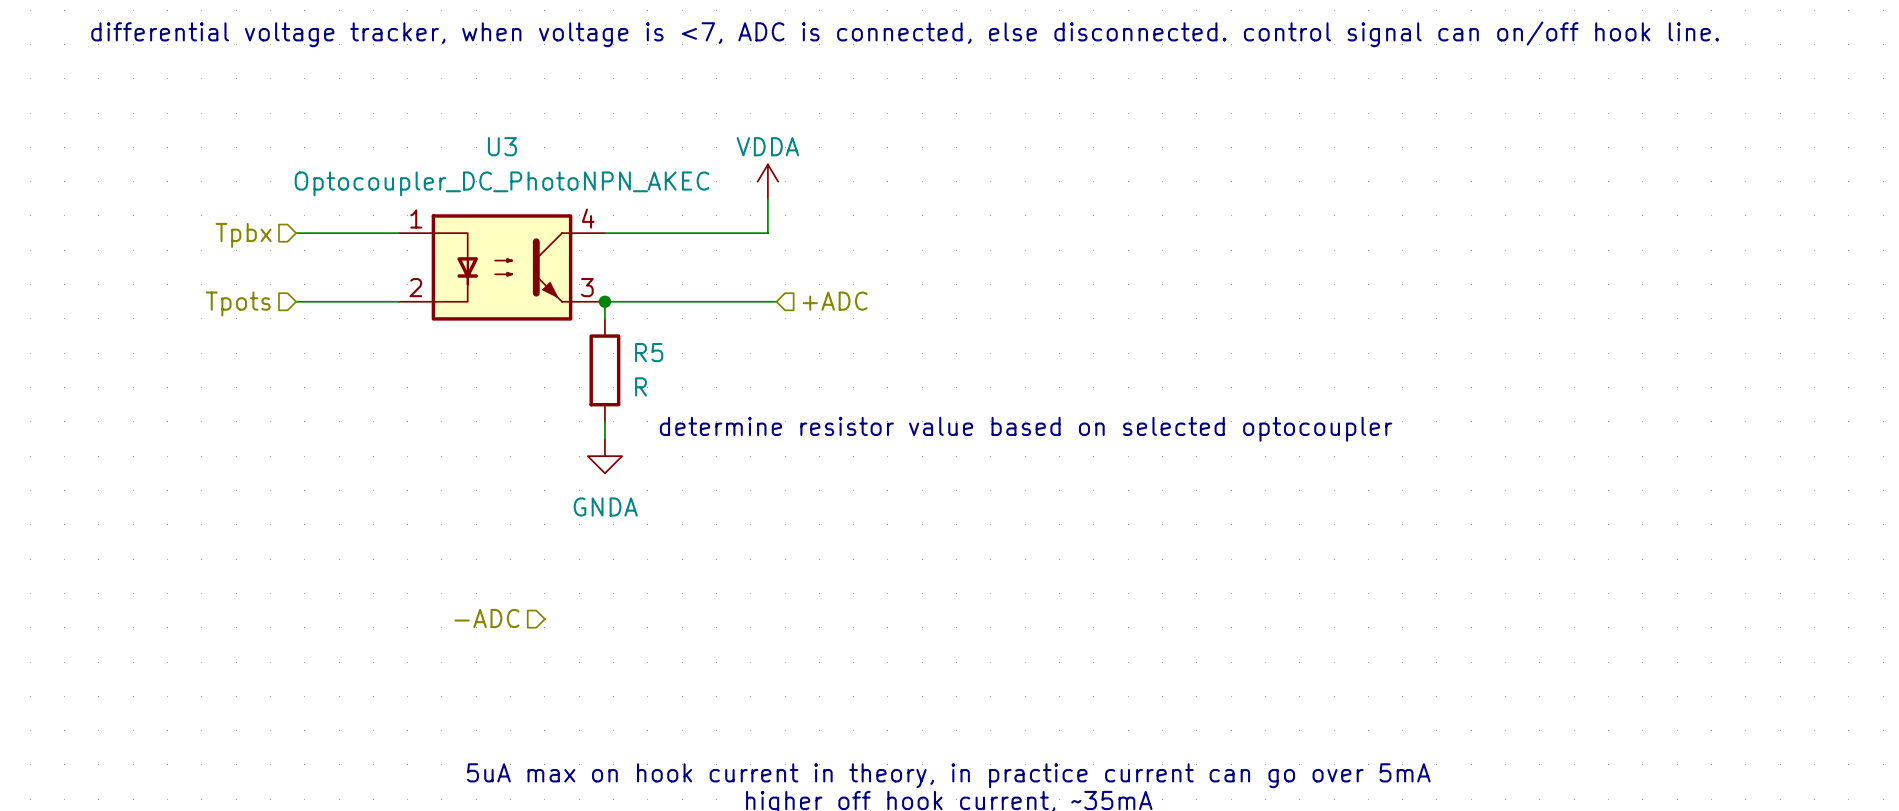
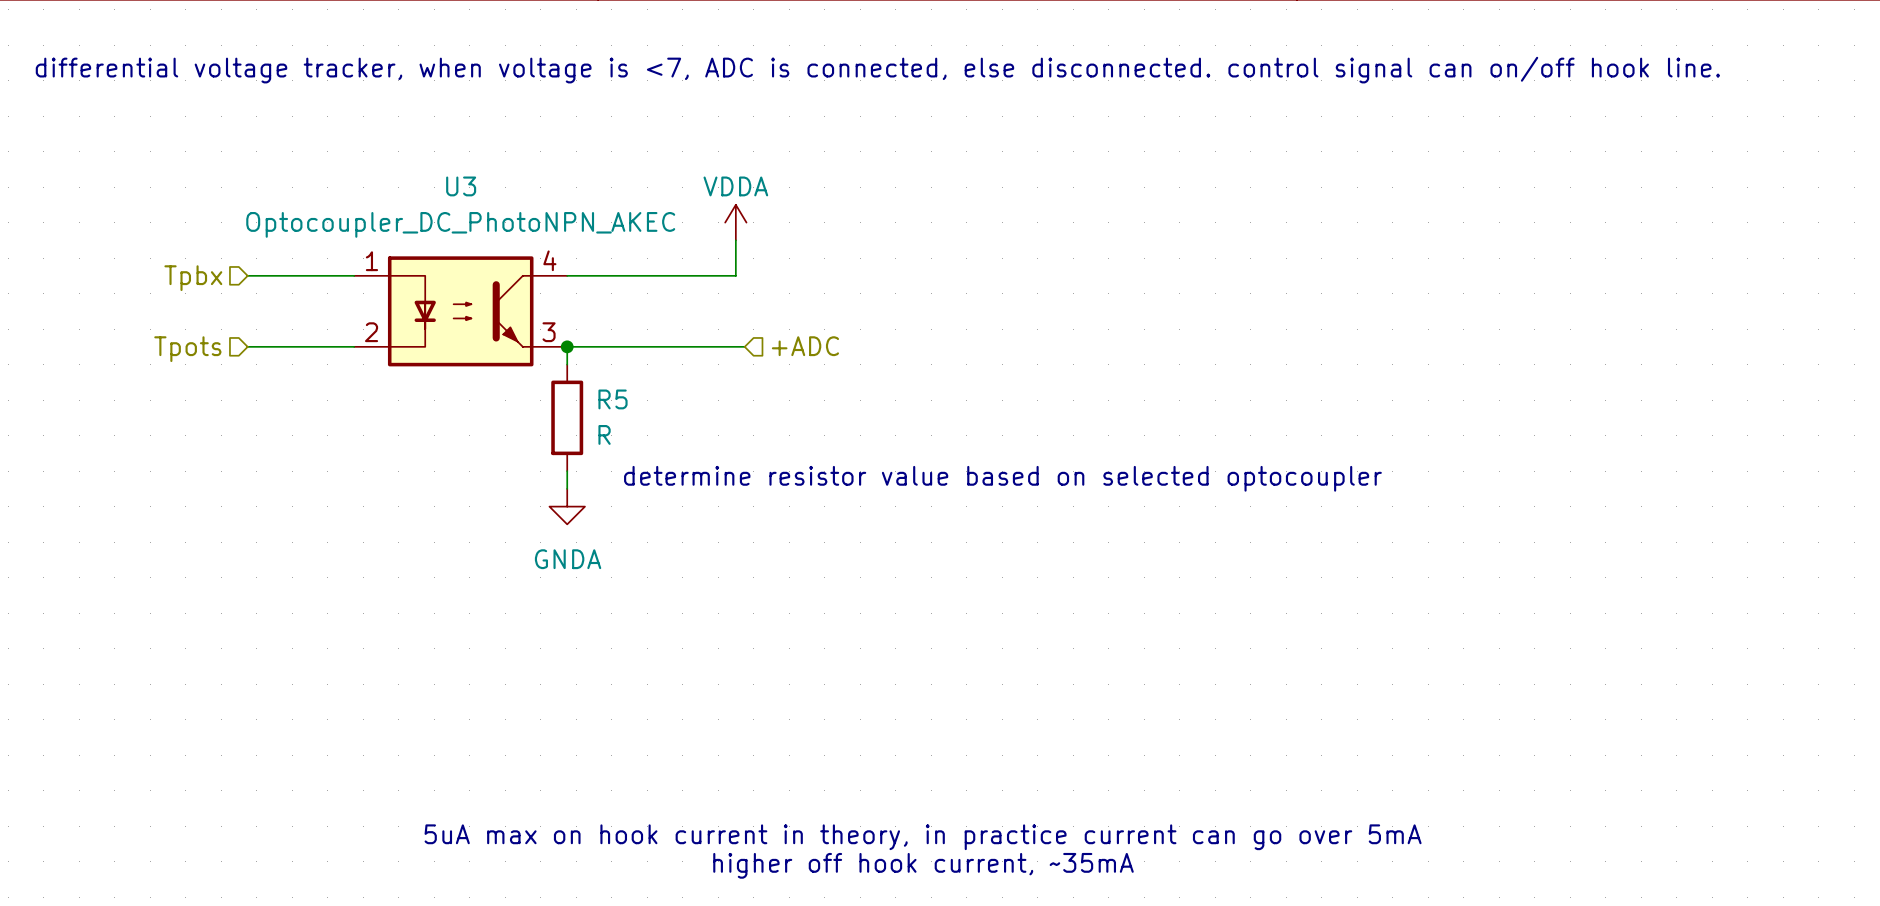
hierarchical label: -ADC (487, 618) -> none

